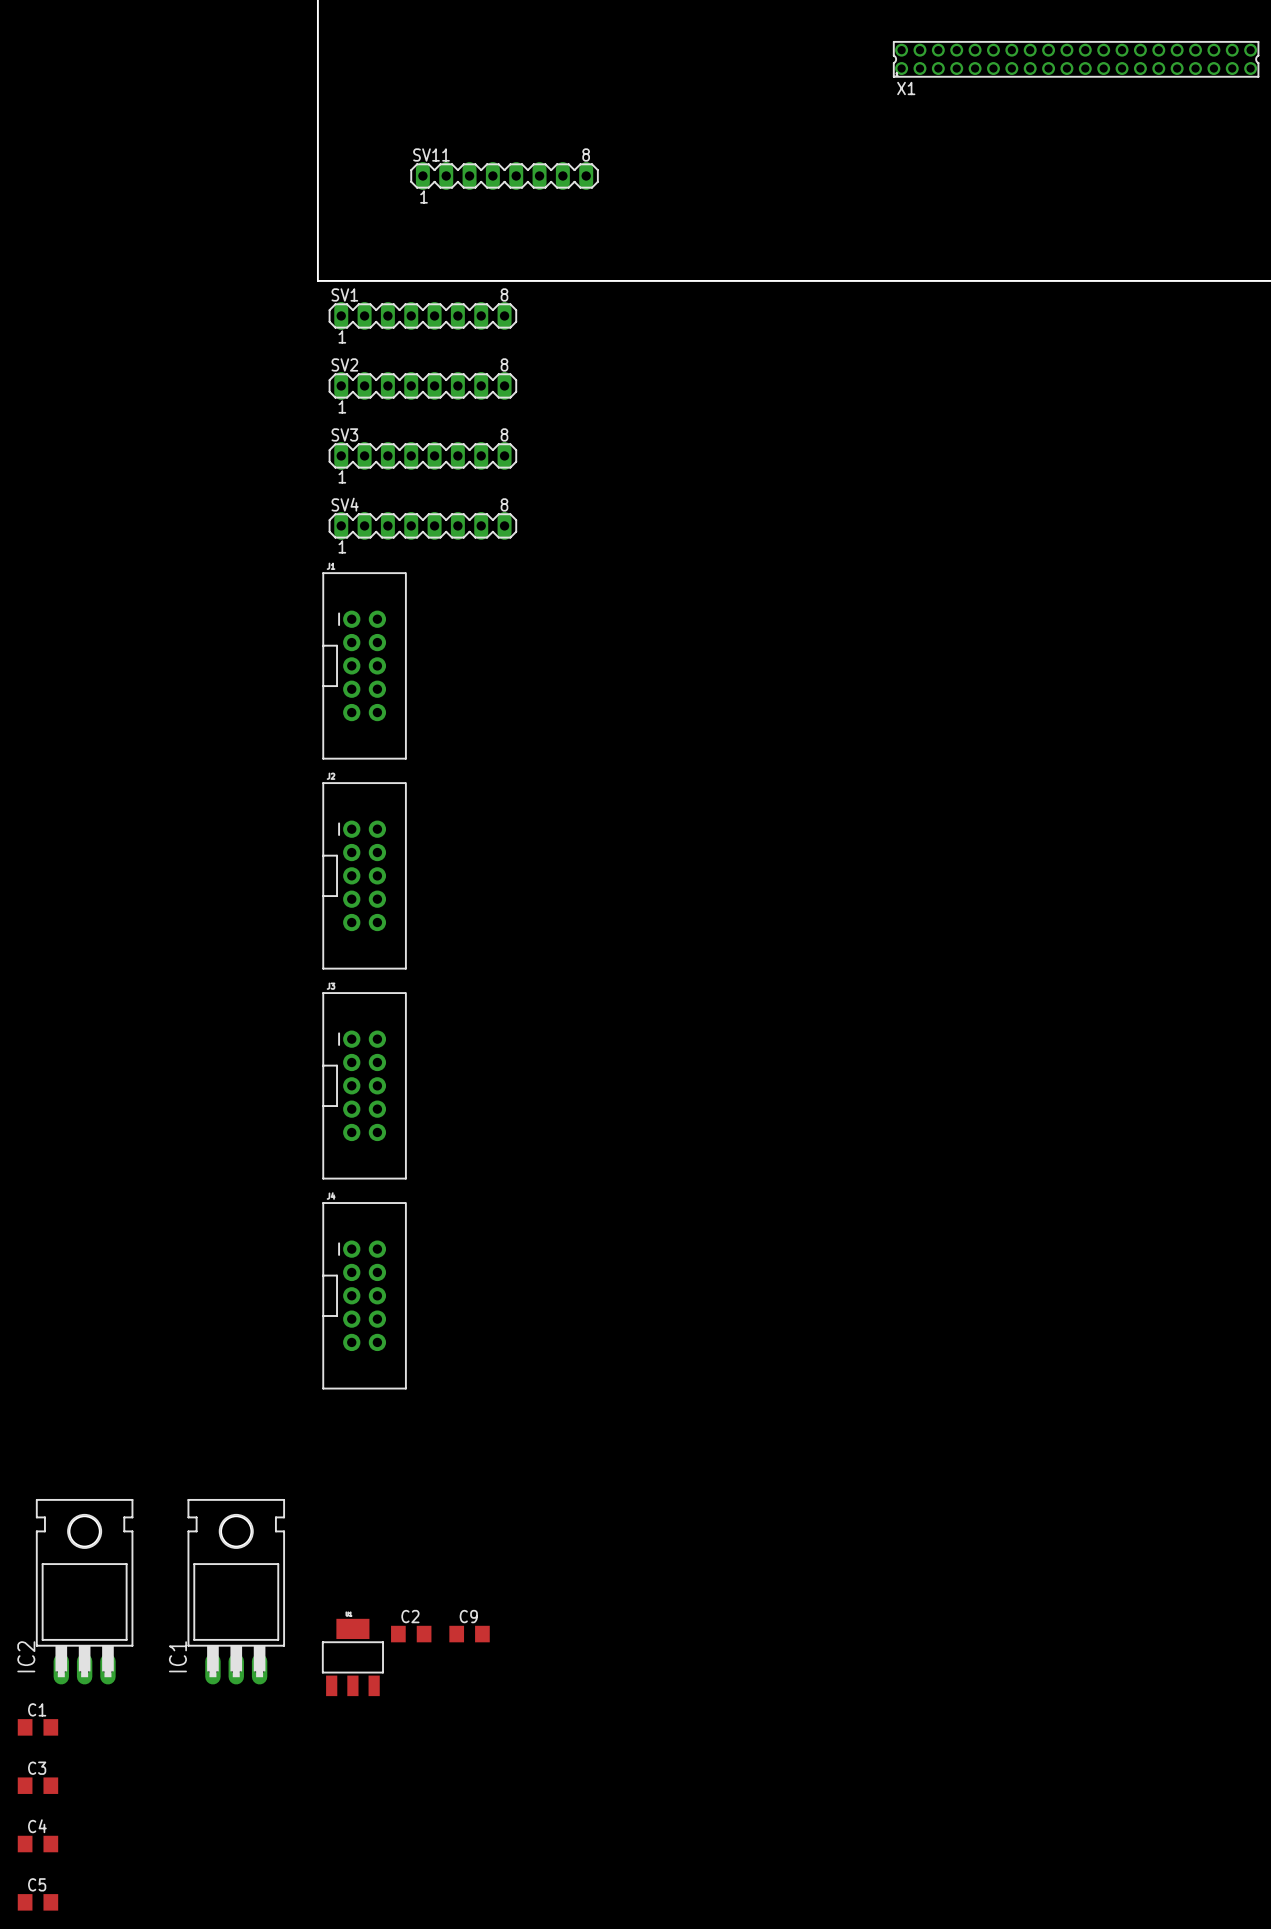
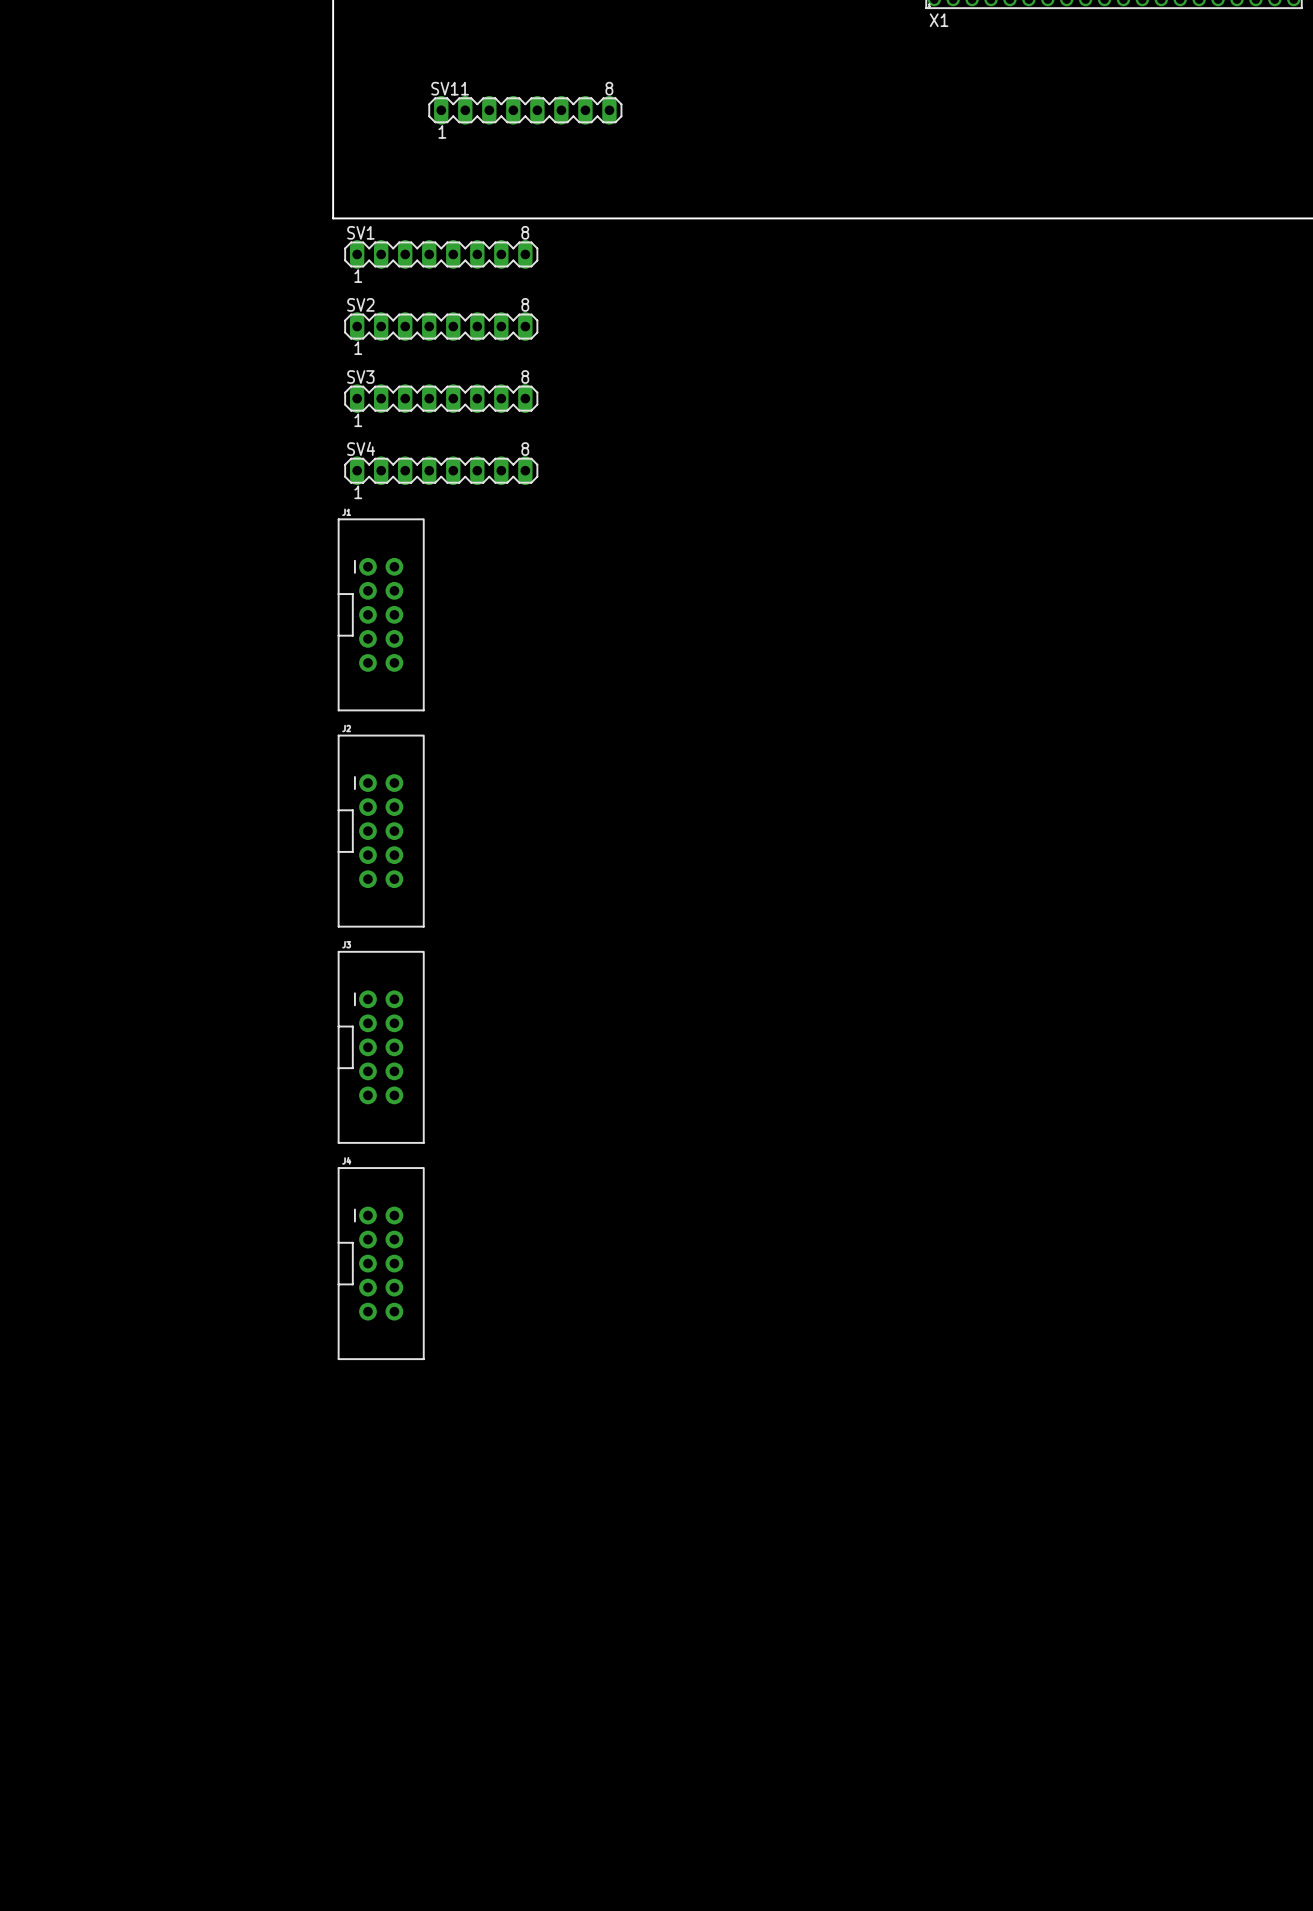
IC2: (84, 1591) -> none
IC1: (236, 1591) -> none
C2: (411, 1634) -> none
C9: (469, 1634) -> none
part: (352, 1657) -> none
C1: (37, 1727) -> none
C3: (37, 1785) -> none
C4: (37, 1844) -> none
C5: (37, 1902) -> none

